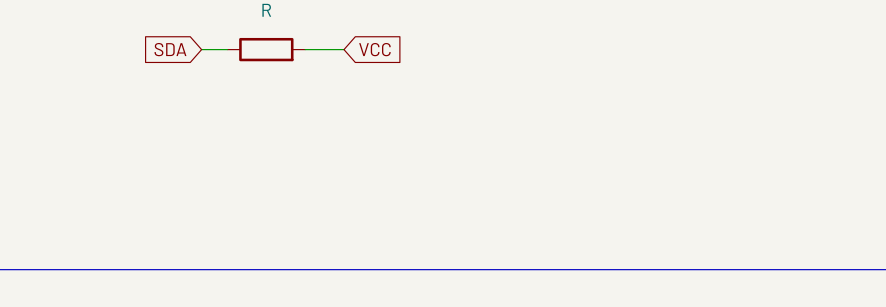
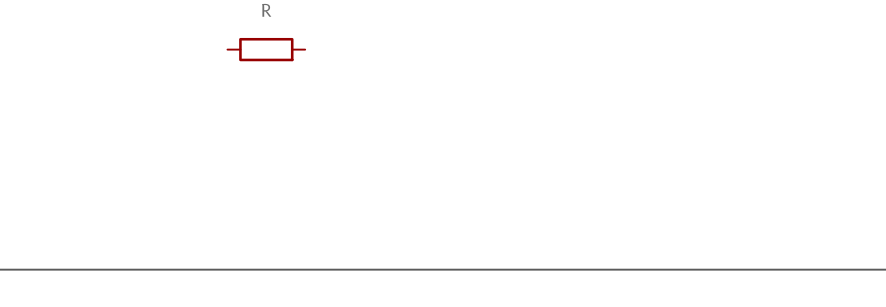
global label: SDA (170, 49) -> none
wire: (201, 49) (227, 49) -> none
wire: (305, 49) (343, 49) -> none
global label: VCC (374, 49) -> none

